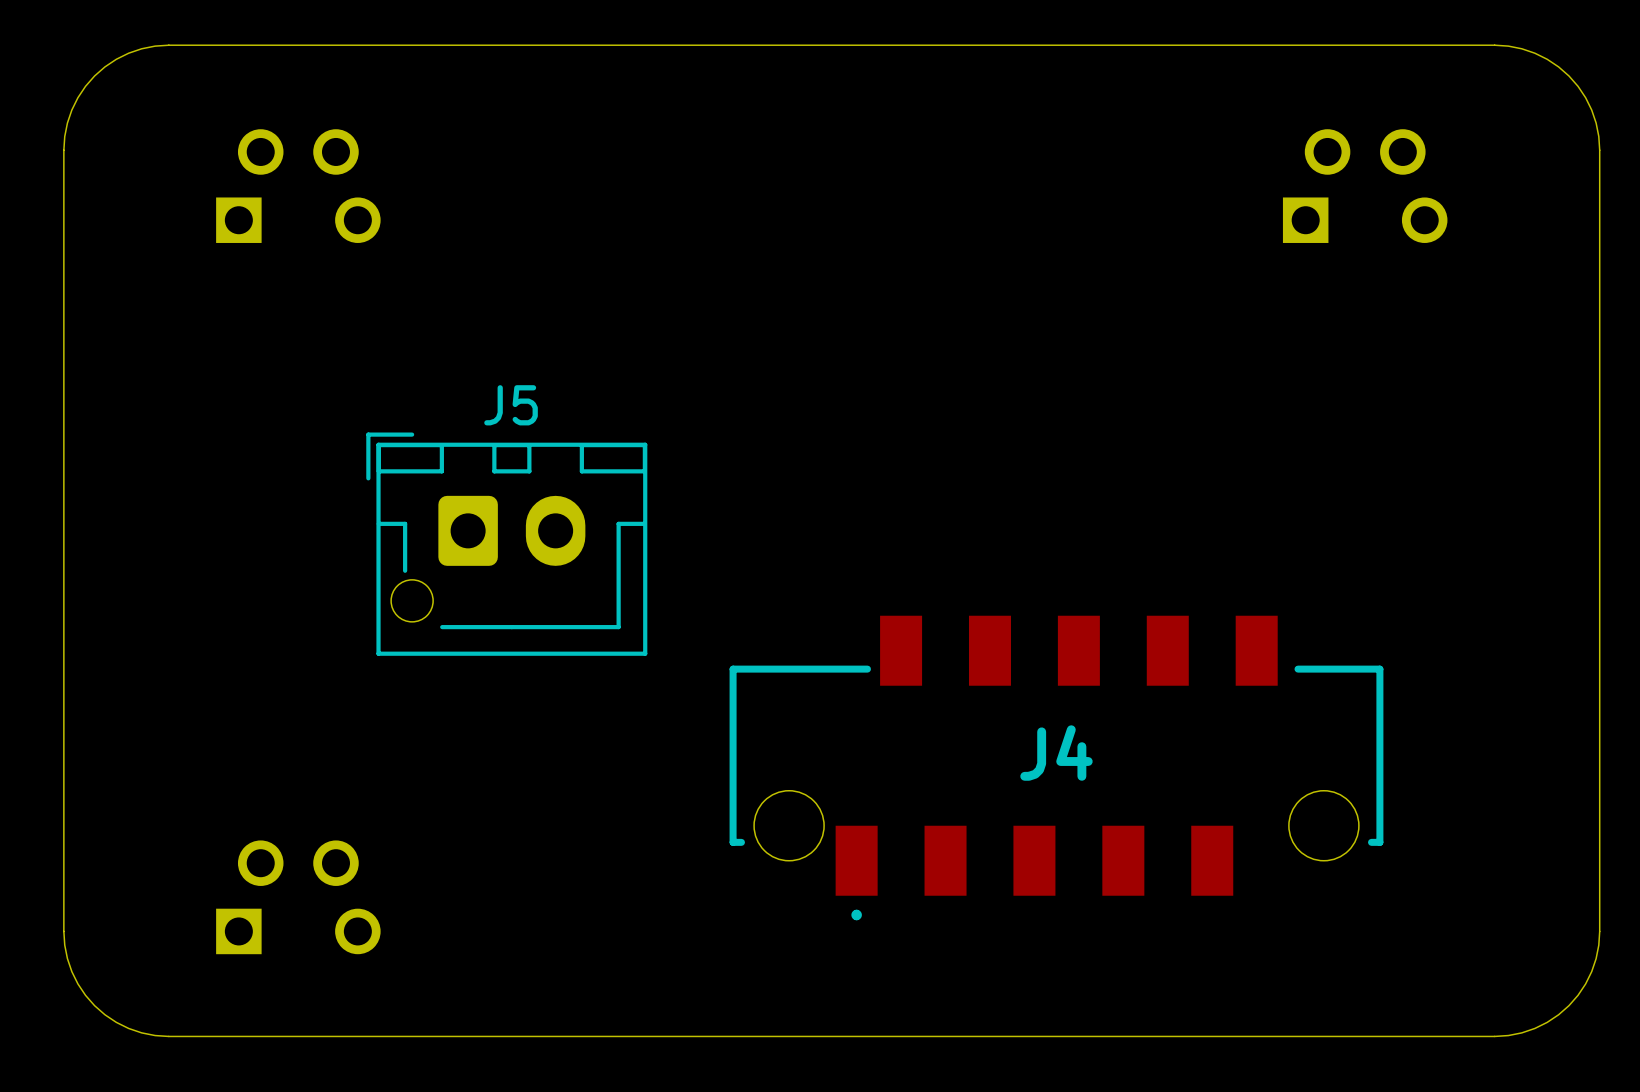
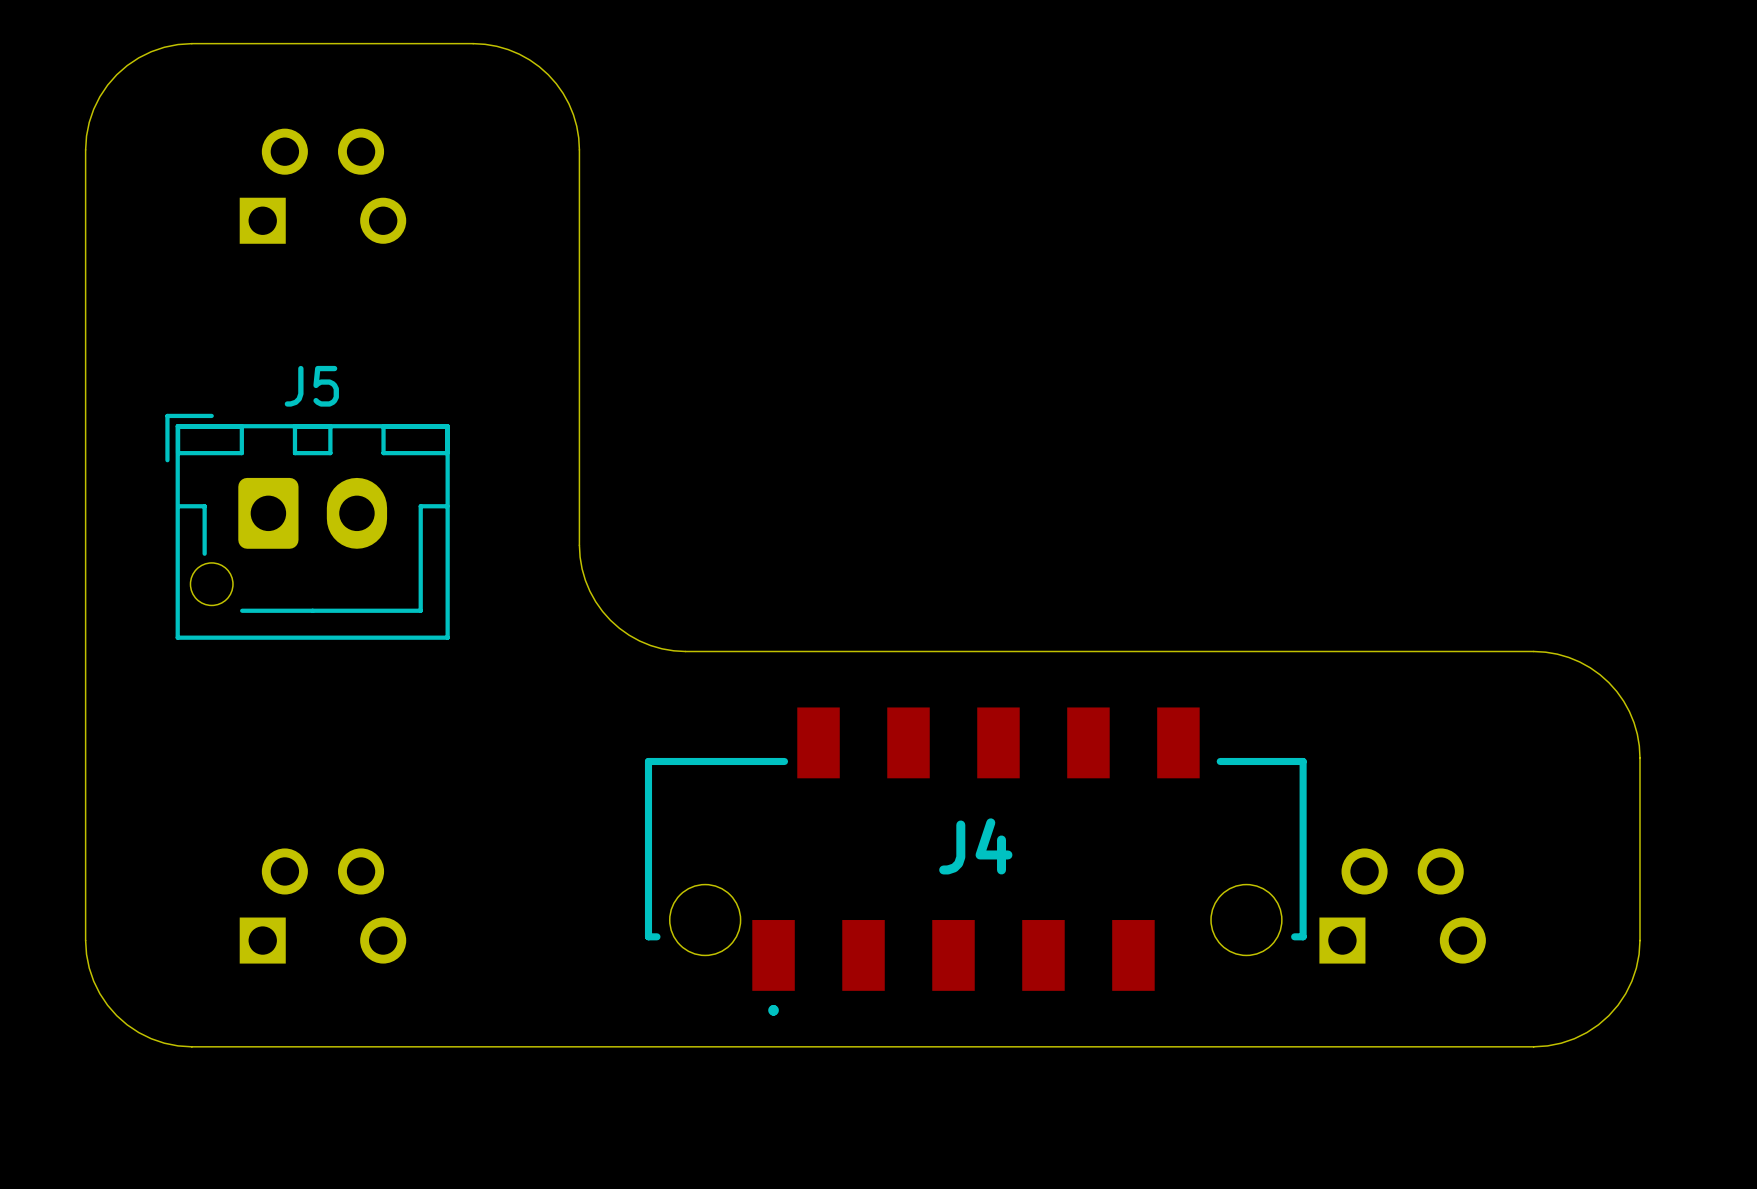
board edge: (446, 45) (1494, 45) (1521, 48) (1547, 59) (1568, 75) (1578, 86) (1591, 110) (1598, 136) (1599, 750) -> (473, 43) (508, 49) (539, 66) (563, 93) (576, 126) (579, 149) (580, 557) (585, 580) (595, 601) (610, 620) (629, 635) (650, 645) (685, 651) (1545, 652) (1579, 662) (1608, 682) (1629, 711) (1637, 734) (1639, 757)
part position: (1365, 186) -> (1402, 906)
J5 position: (506, 544) -> (307, 526)
J4 position: (1056, 767) -> (975, 861)

